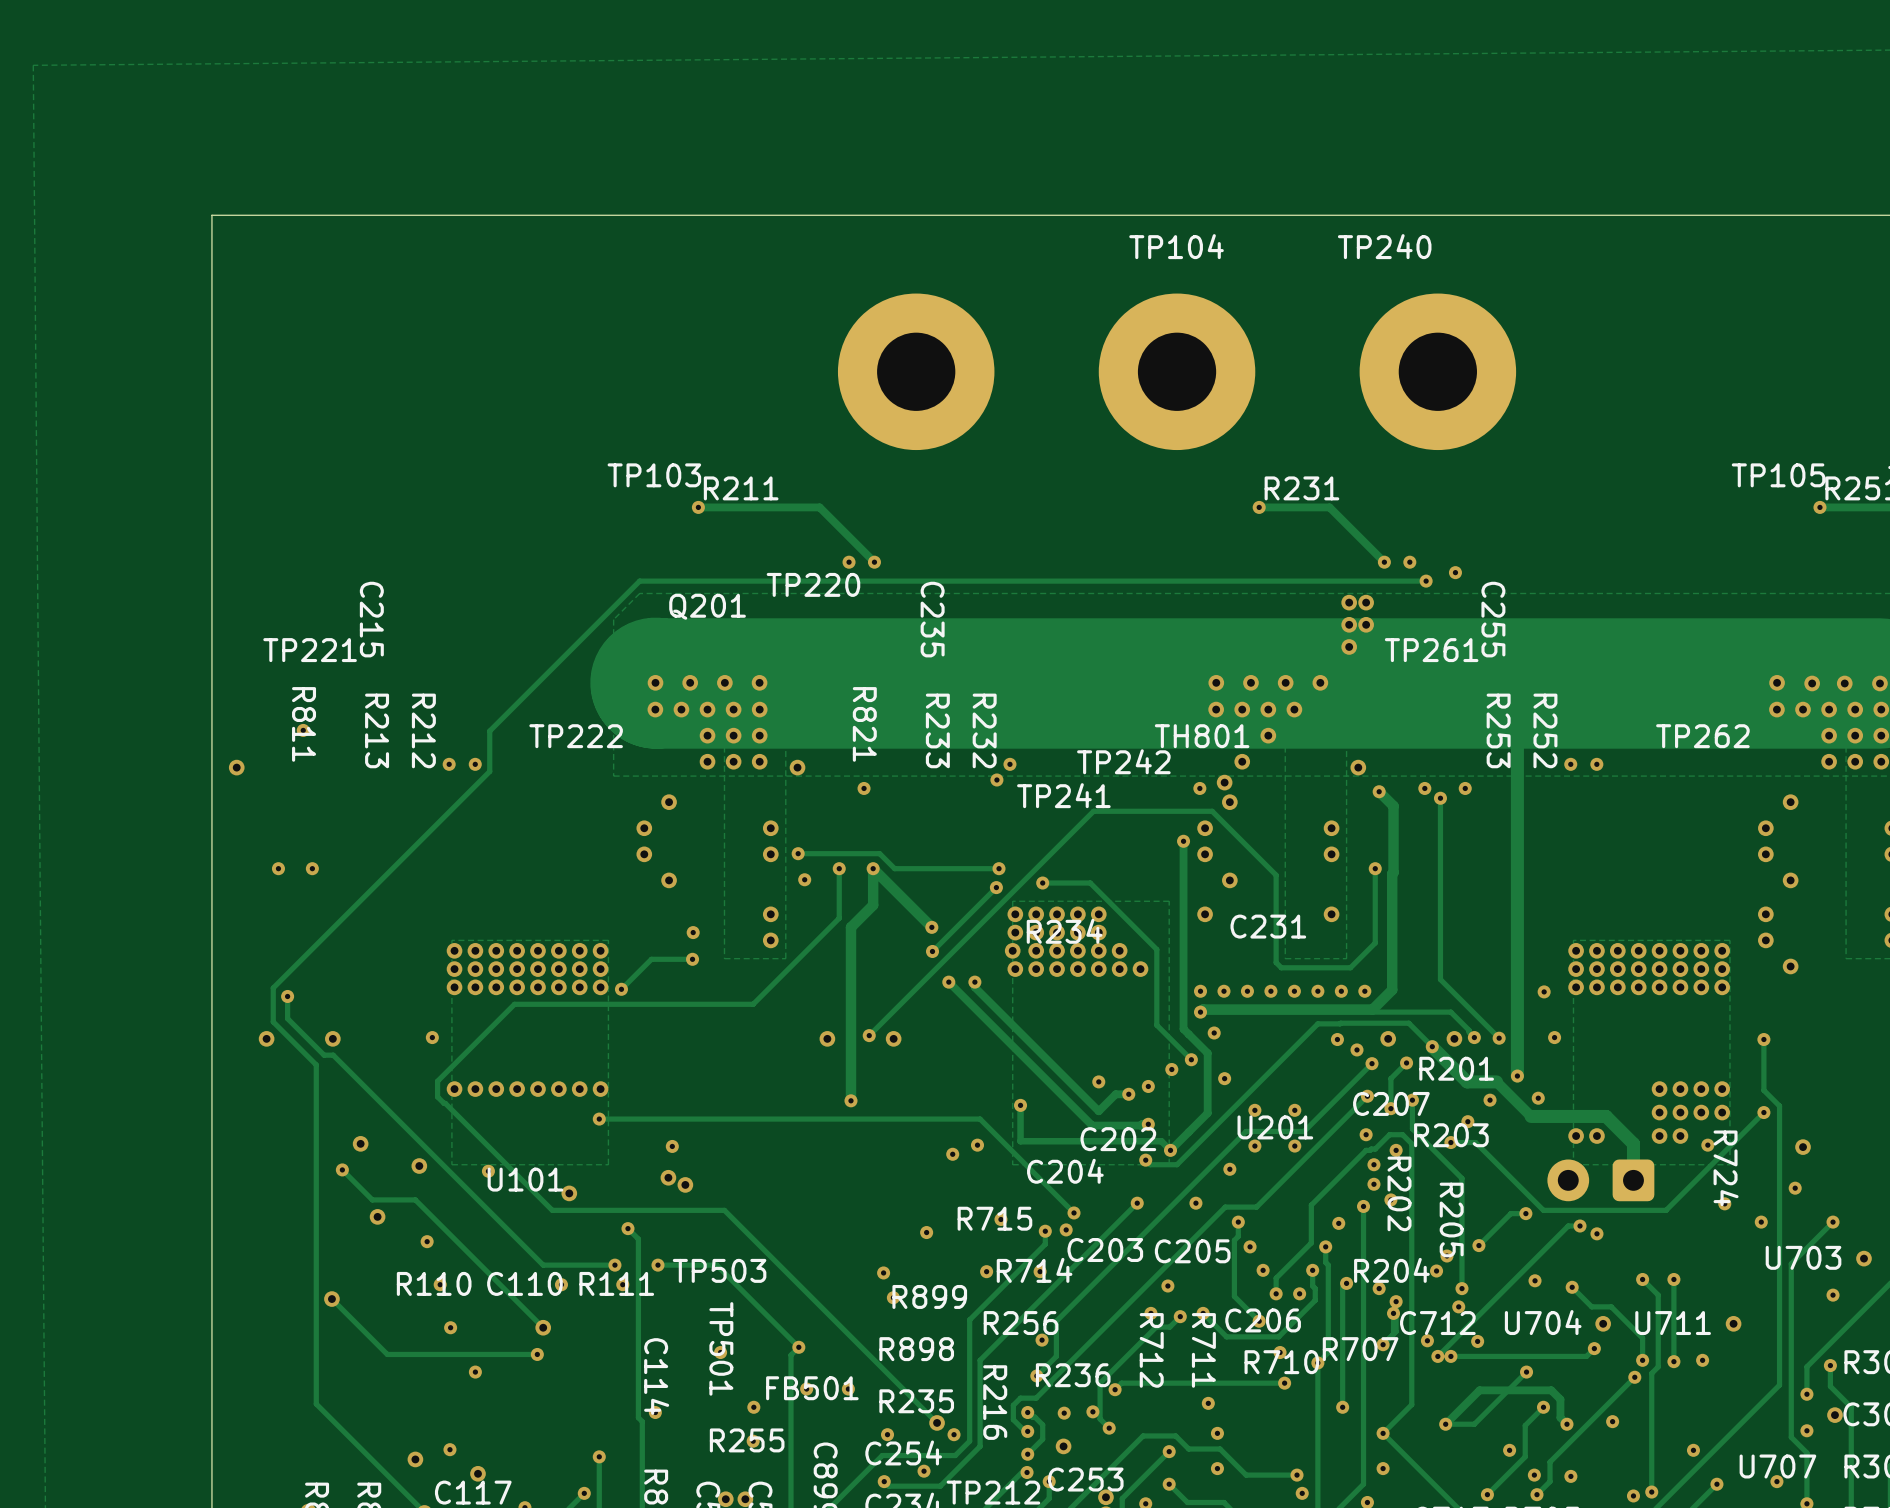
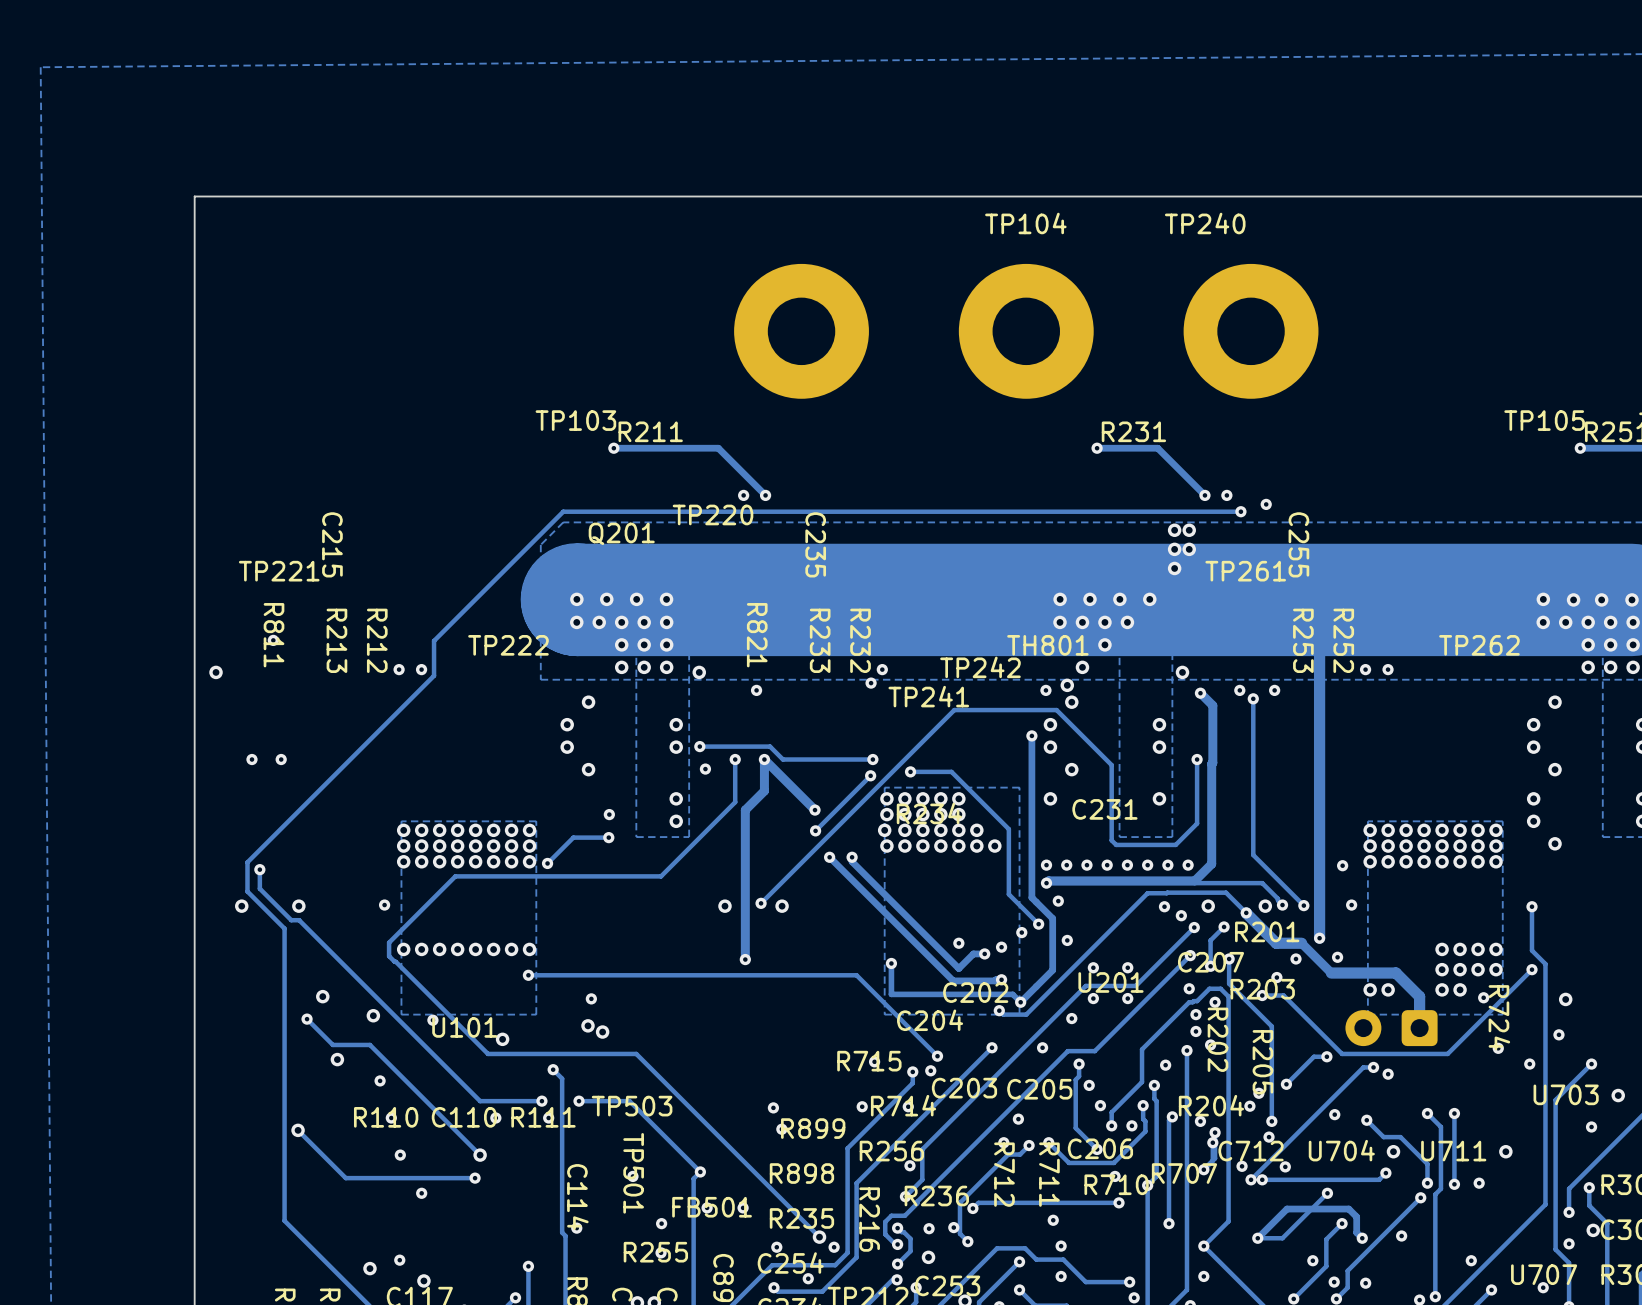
via: (977, 1145) -> none
via: (952, 1154) -> none
via: (926, 1232) -> none

